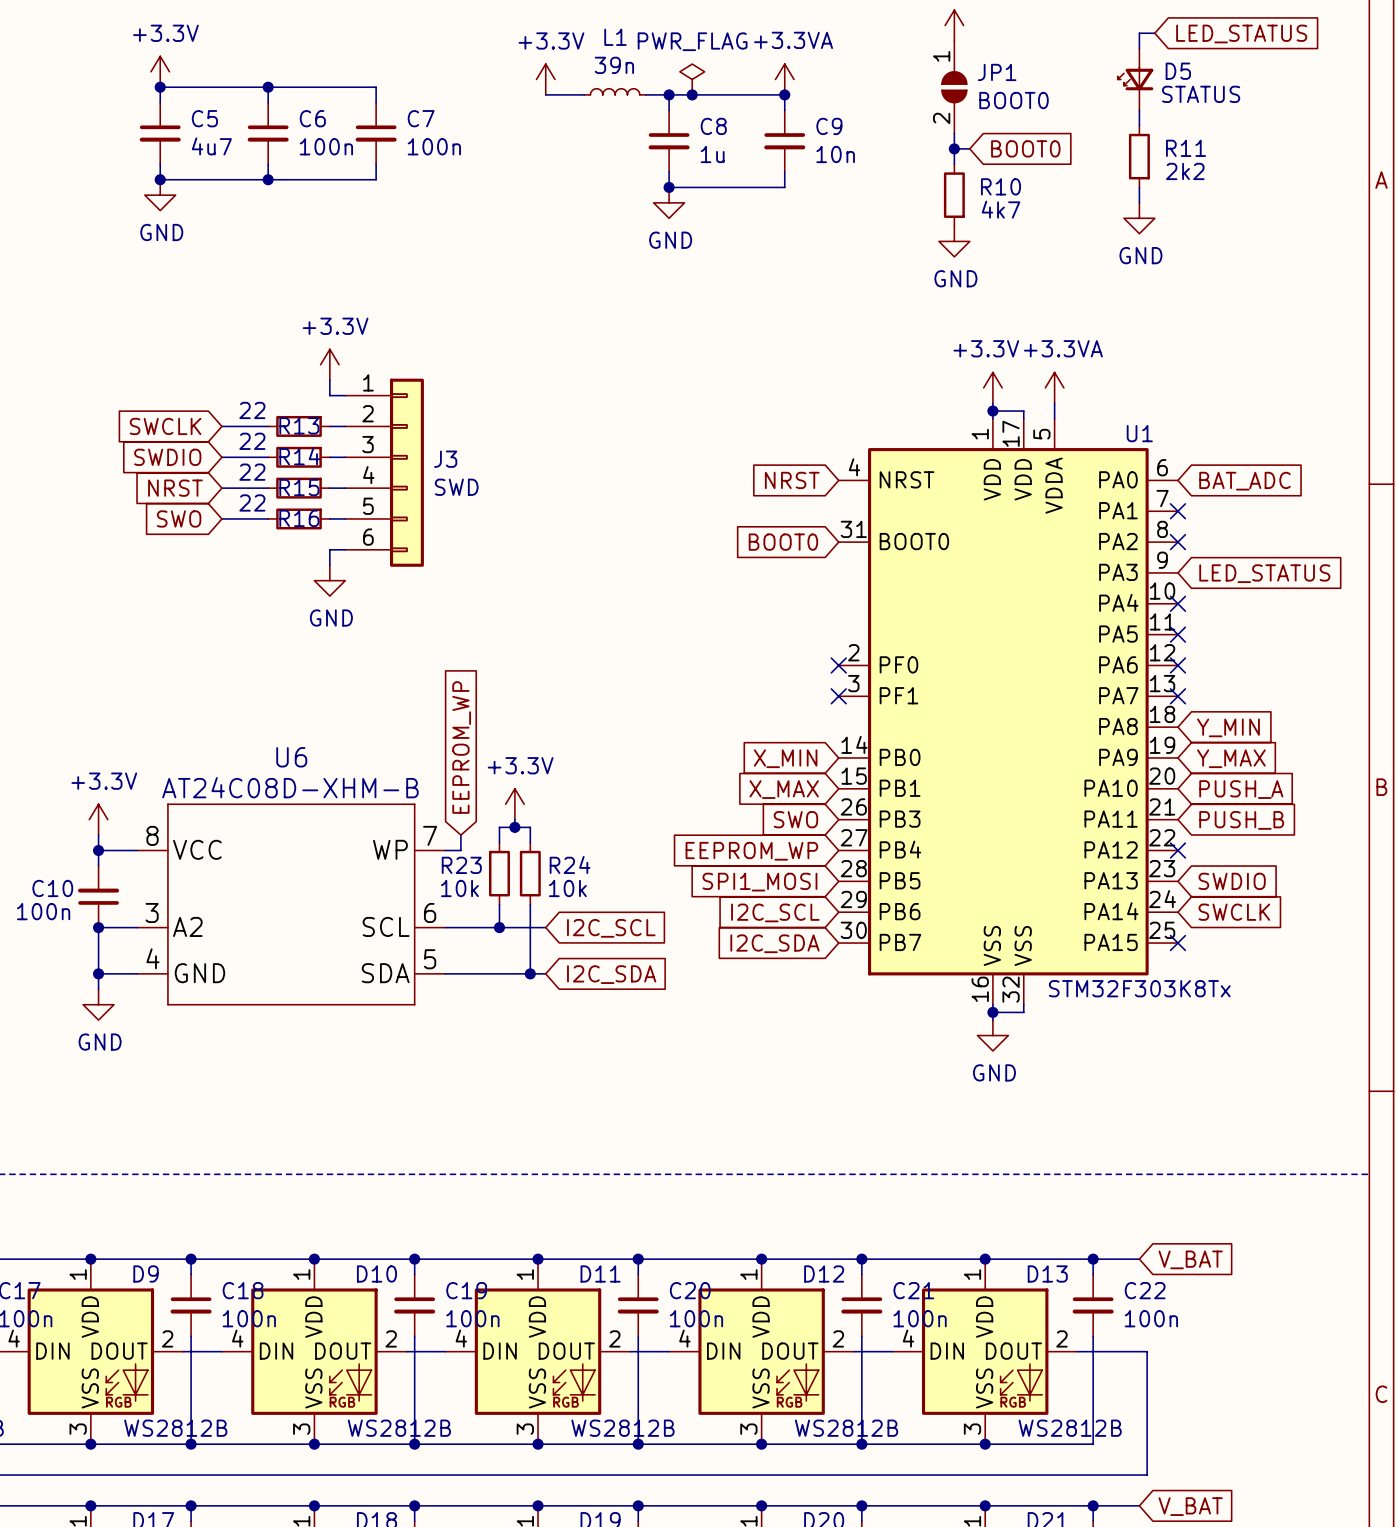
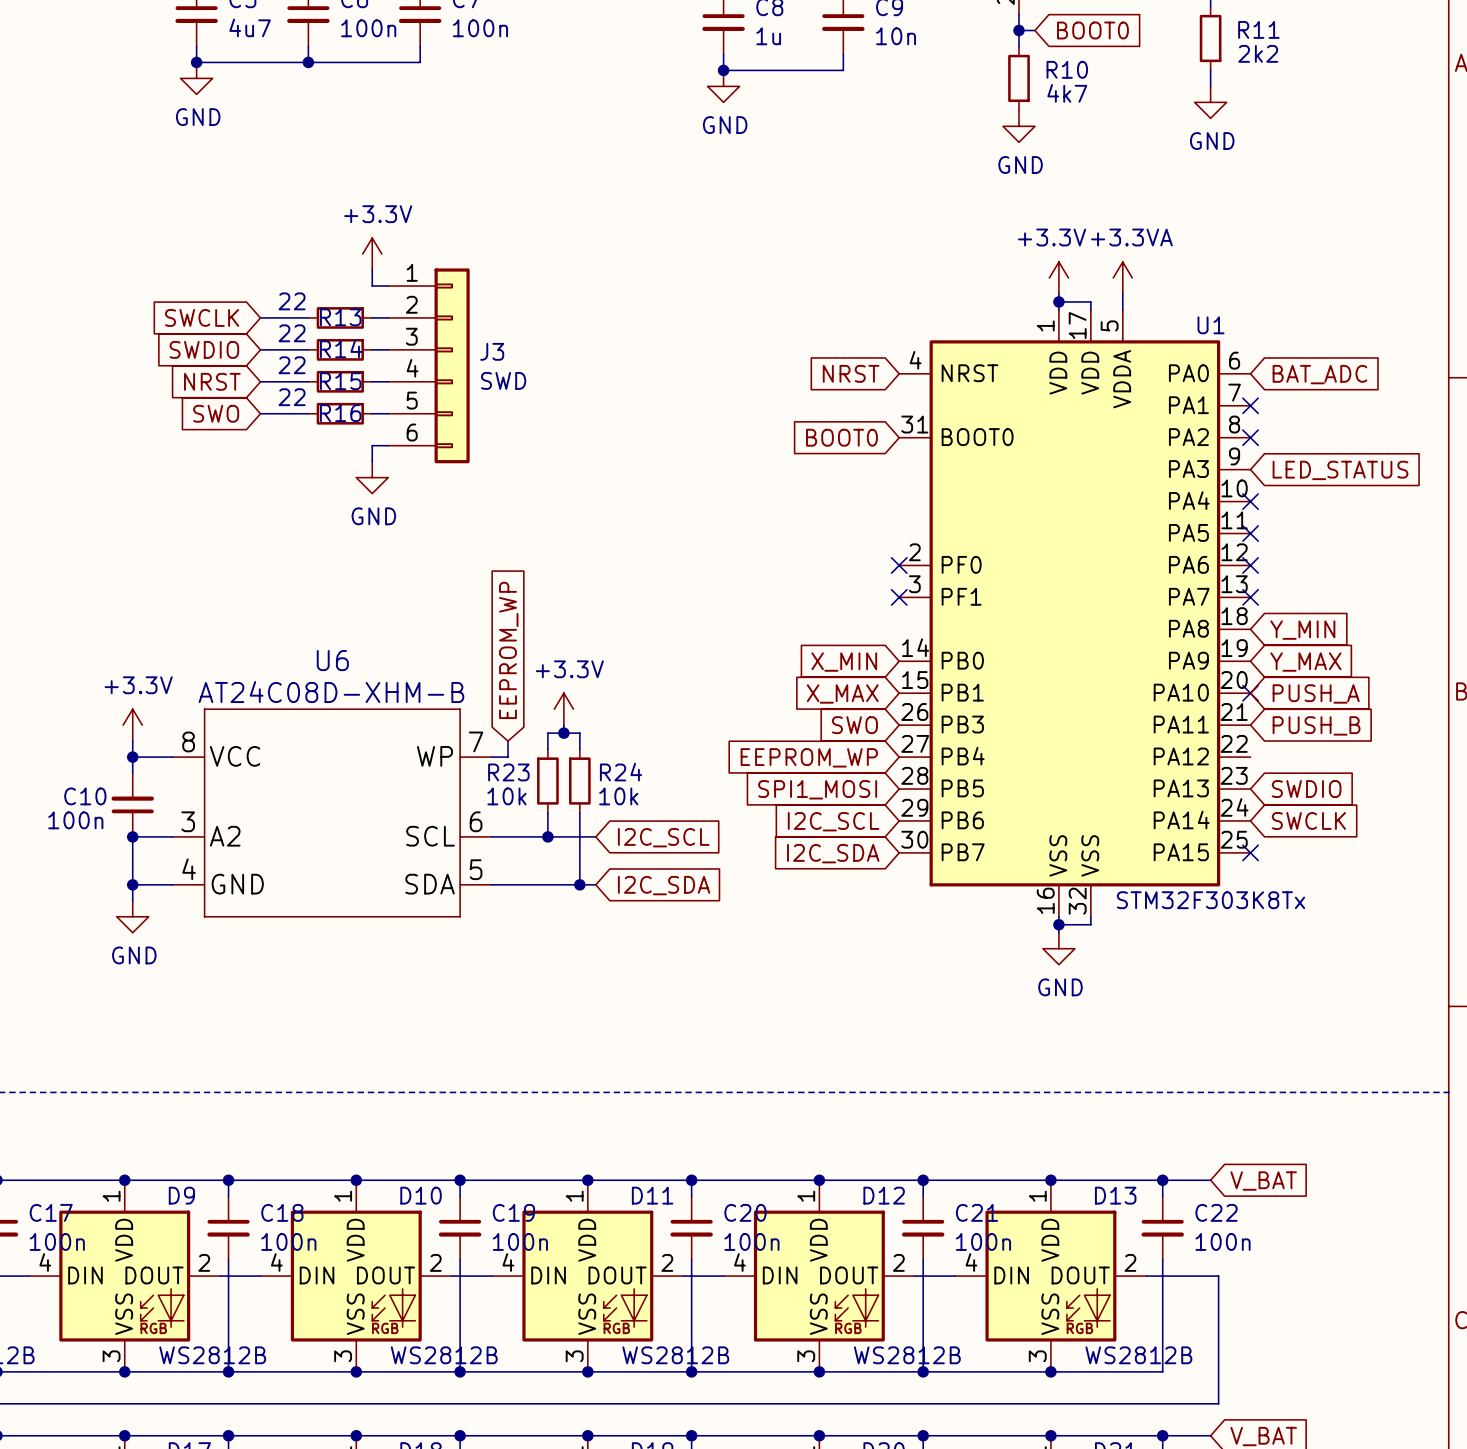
no-connect mark position: (1177, 850) -> (1250, 693)

